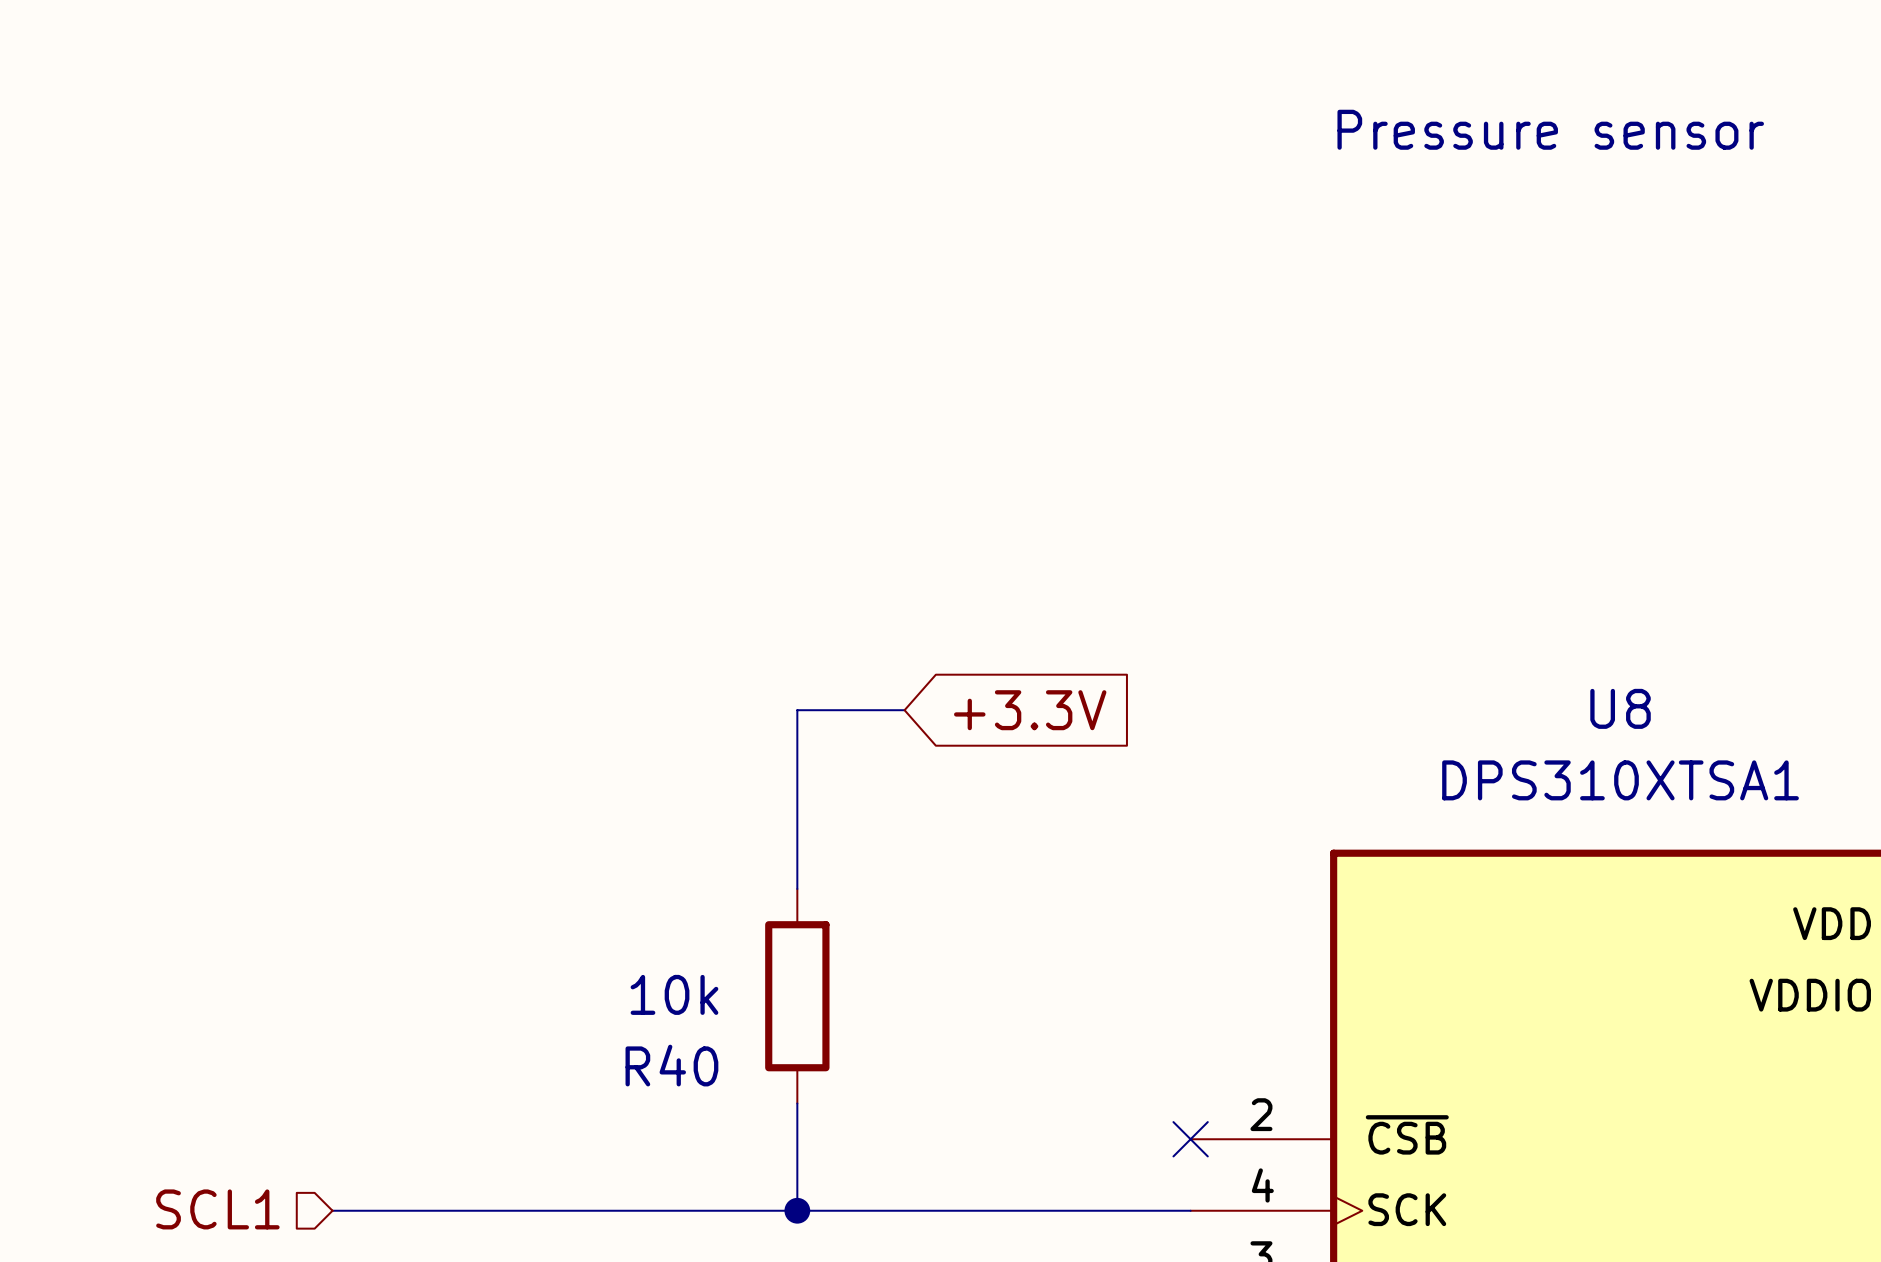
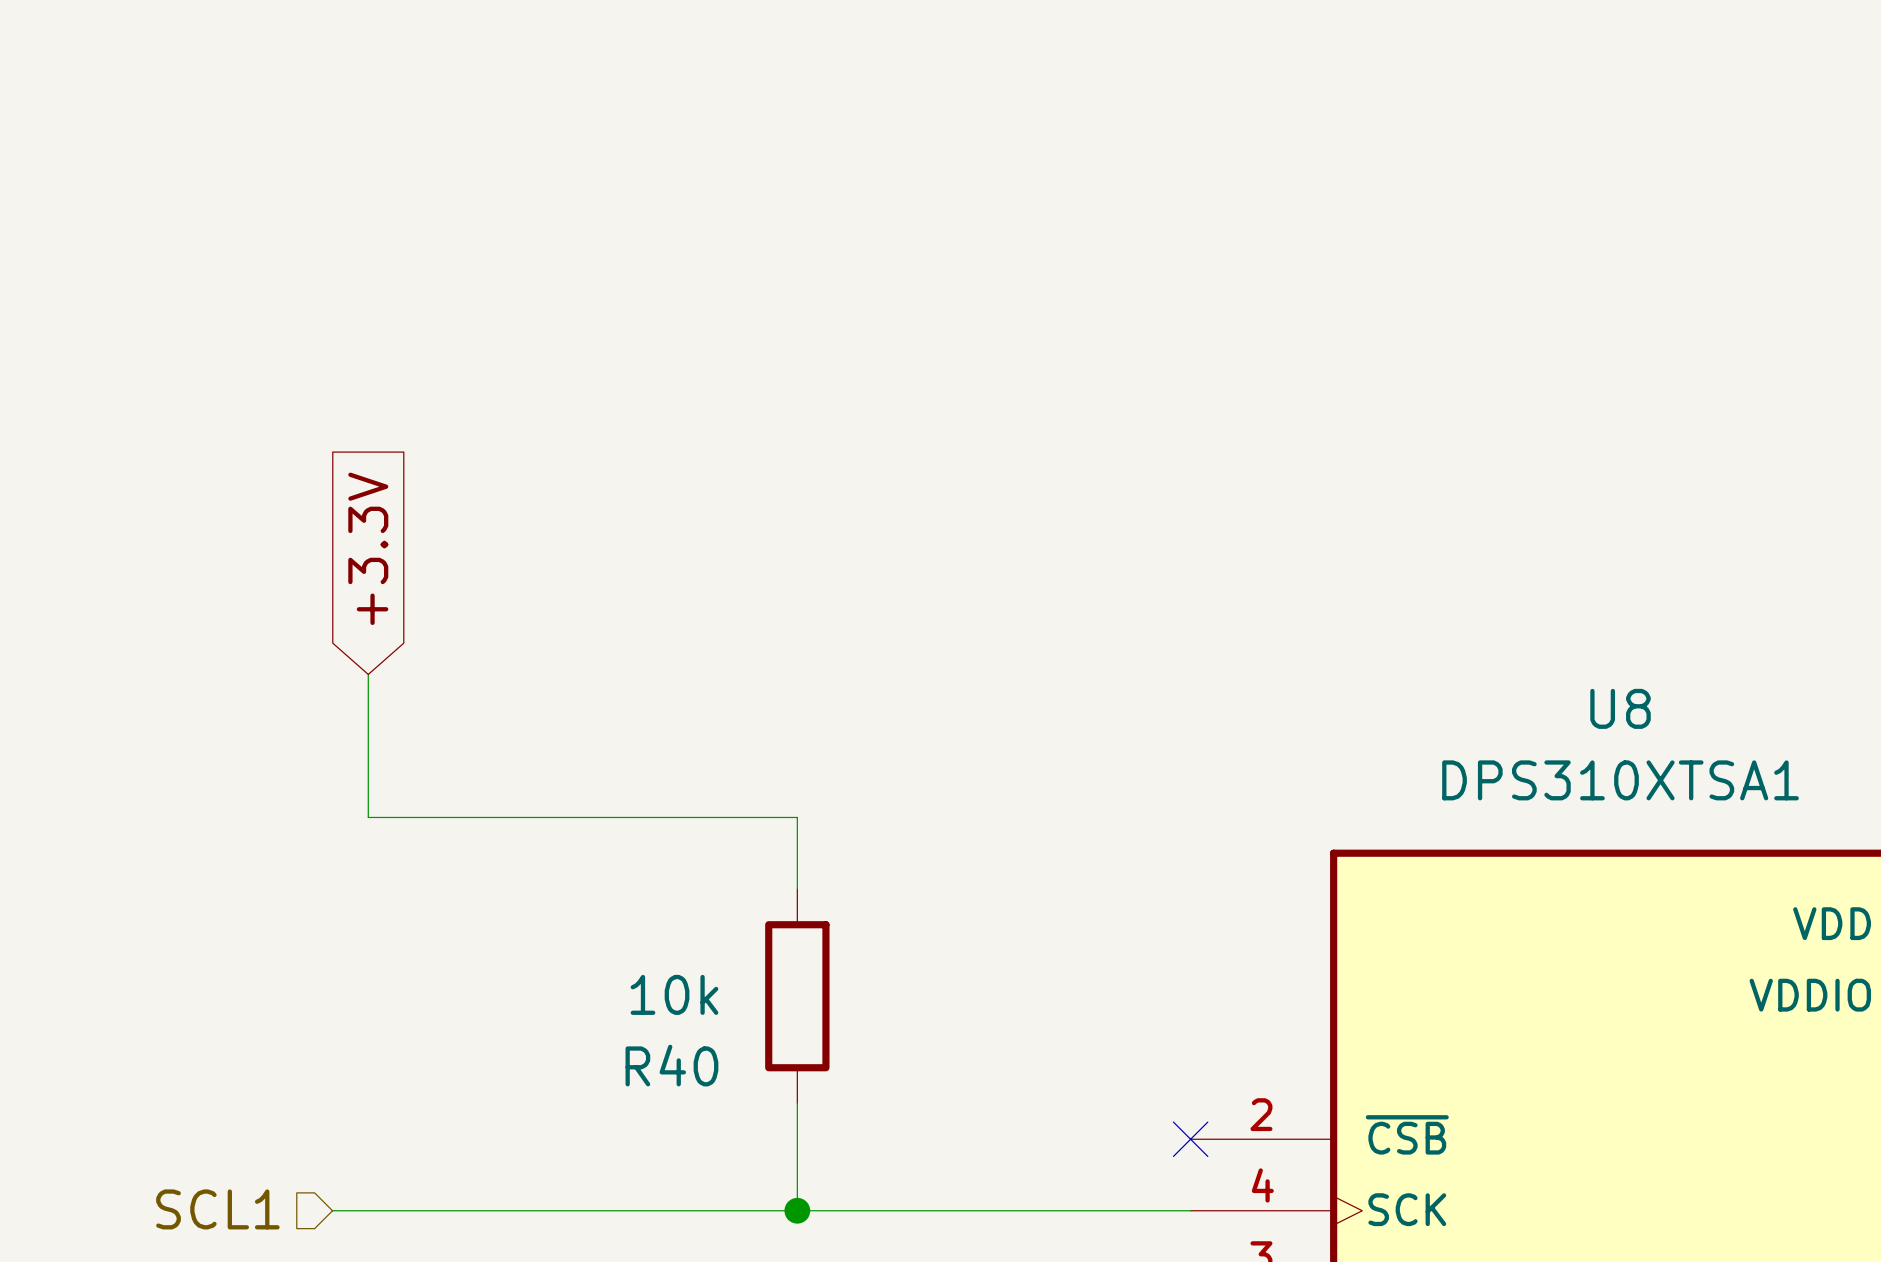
text: Pressure sensor (1550, 129) -> none
wire: (904, 710) (797, 710) (797, 817) -> (368, 674) (368, 817) (797, 817)
global label rotation: 0° (1030, 710) -> 90° counterclockwise (368, 548)
global label position: +3.3V (1030, 710) -> +3.3V (368, 548)

